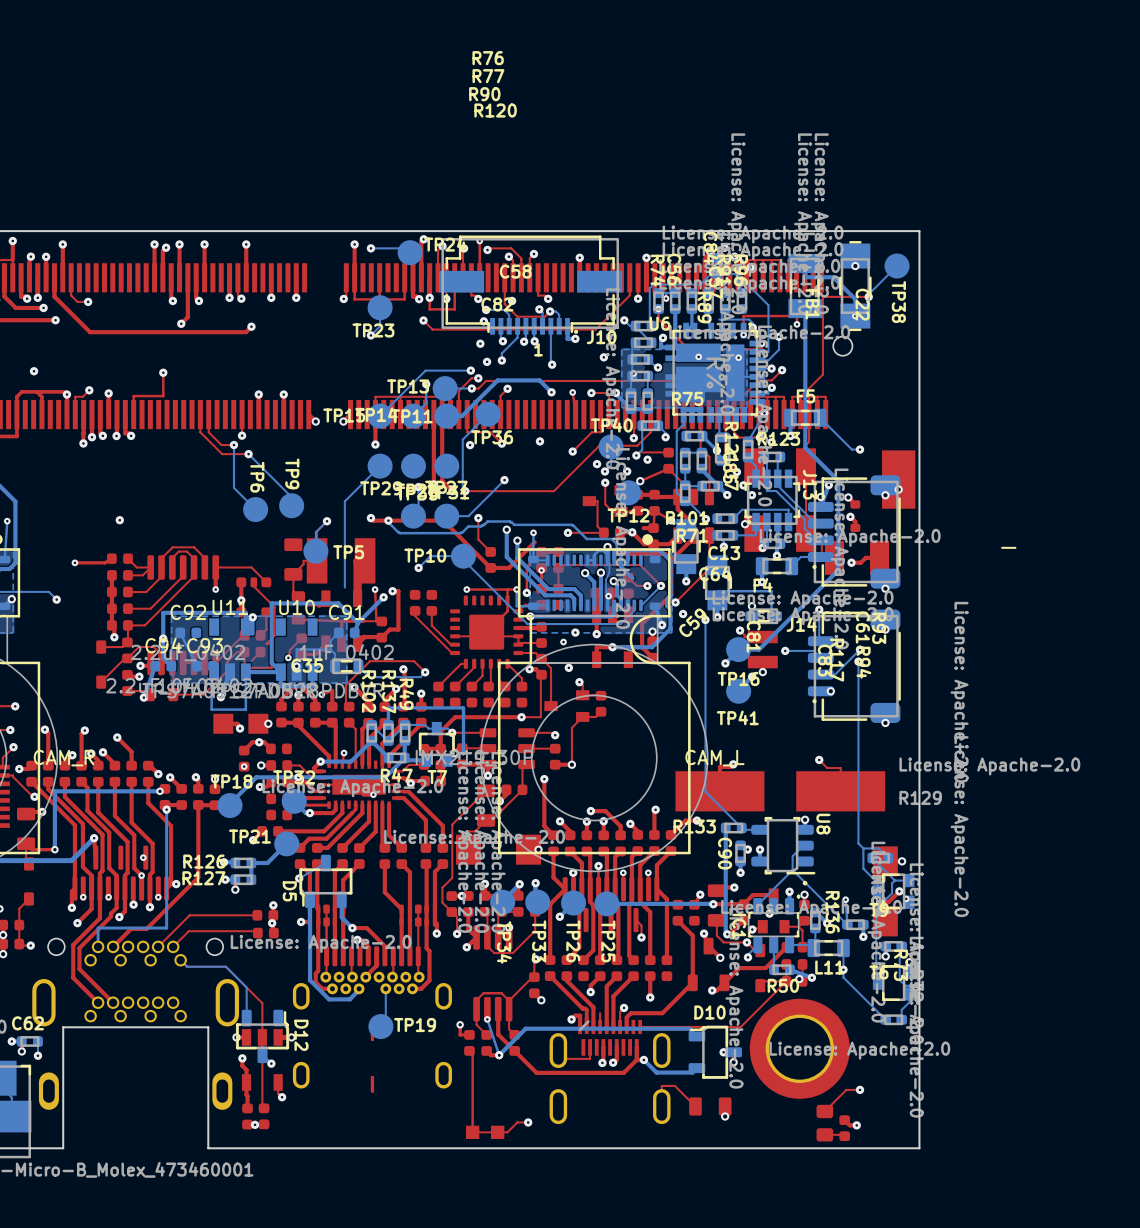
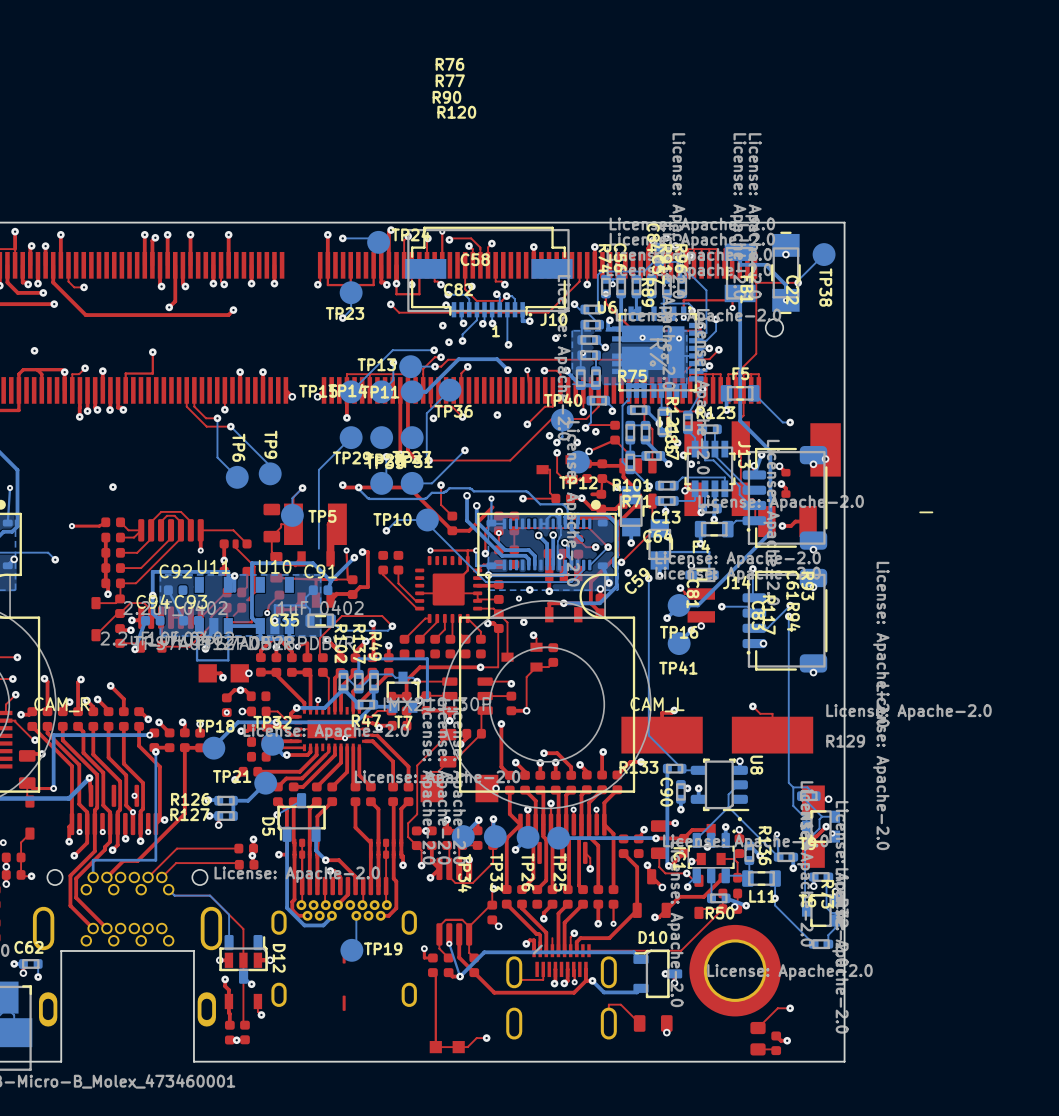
top track: none -> (613, 904) (613, 923)
via: none -> (613, 923)
top track: none -> (573, 969) (574, 982)
via: none -> (574, 982)

